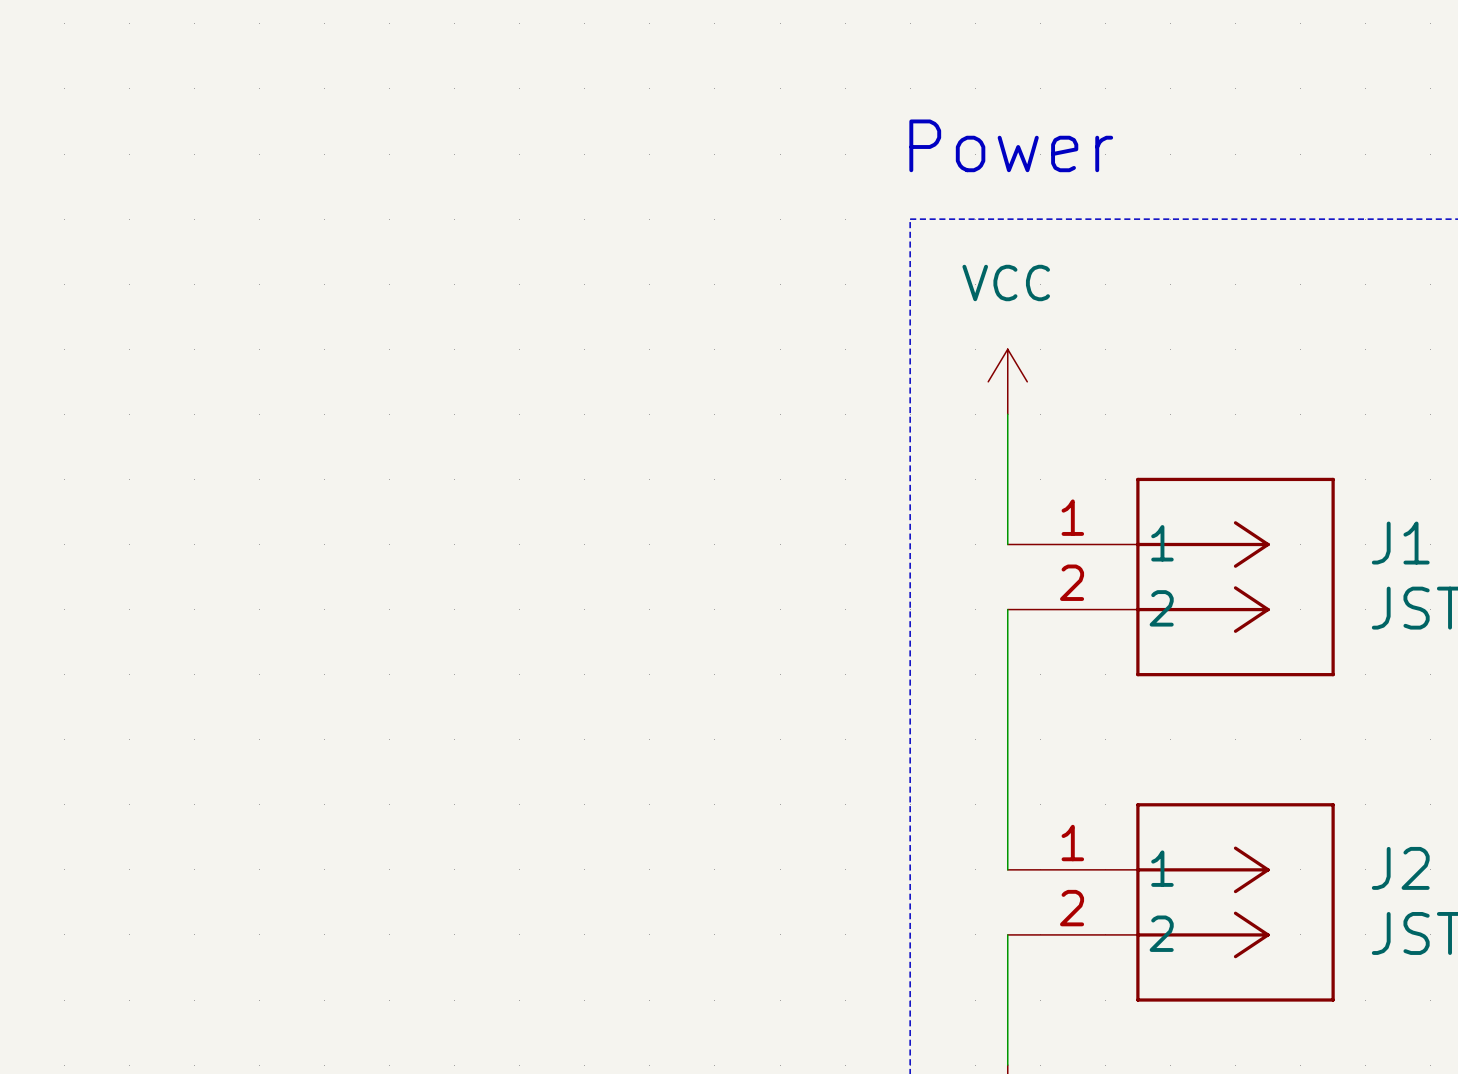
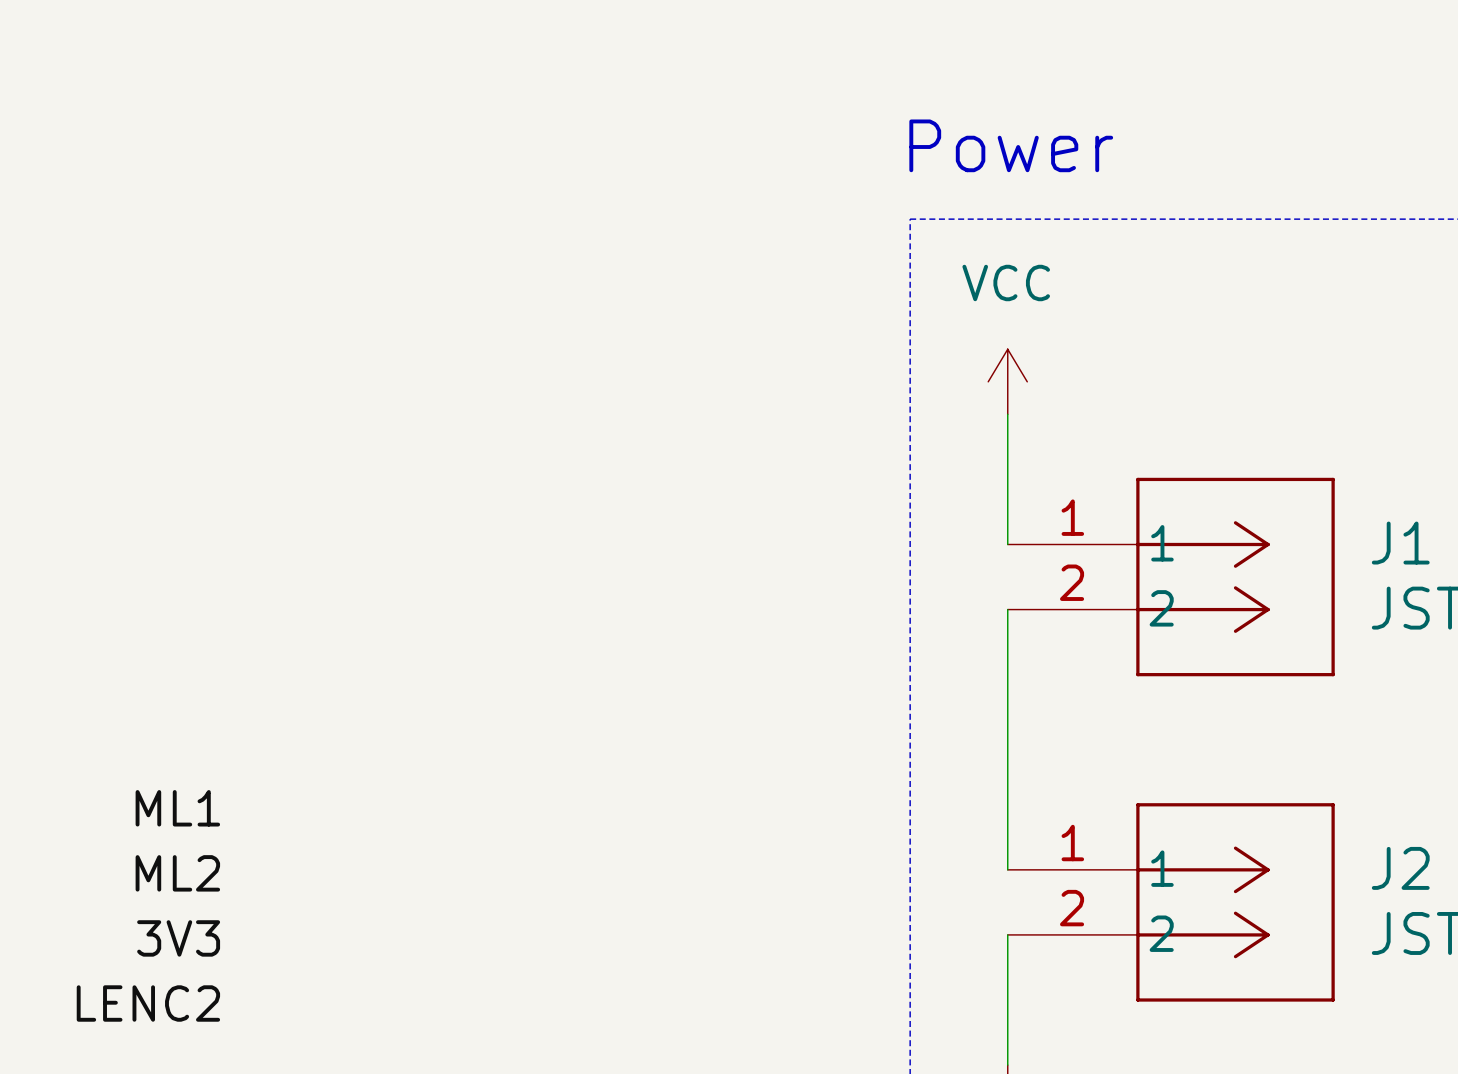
label: none -> ML1 (177, 808)
label: none -> ML2 (177, 873)
label: none -> 3V3 (178, 938)
label: none -> LENC2 (148, 1003)

